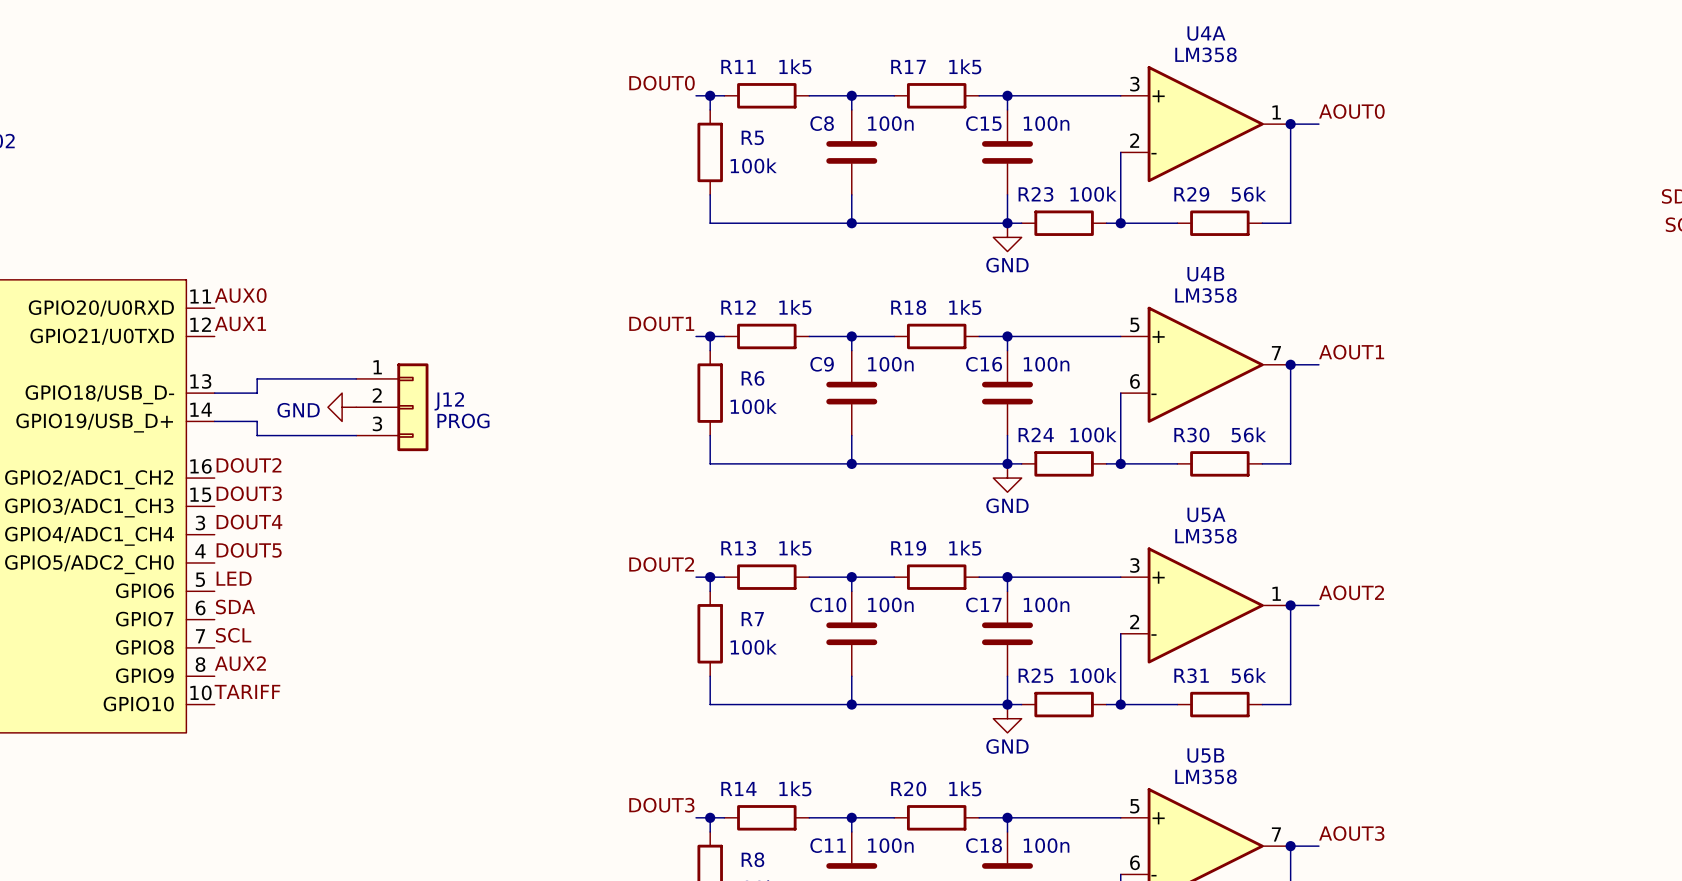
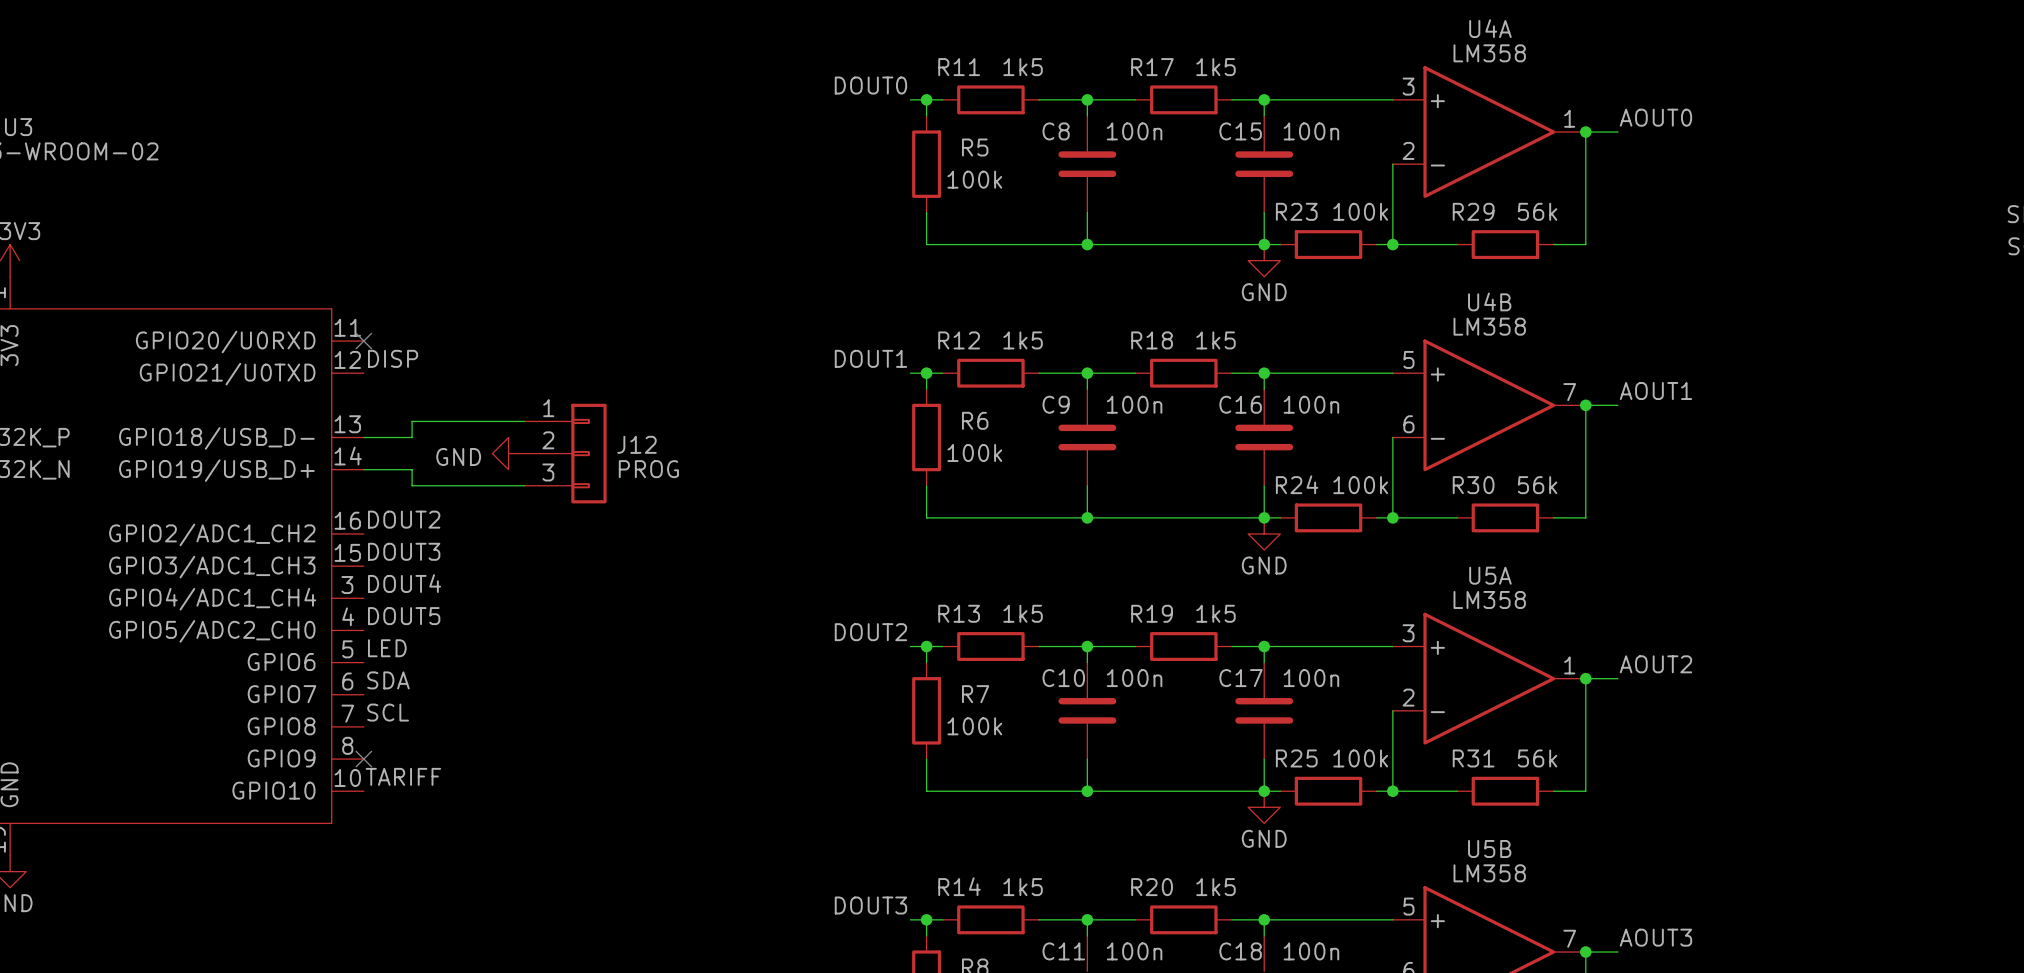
label: AUX0 (240, 295) -> none
no-connect mark: none -> (363, 341)
label: AUX1 (240, 323) -> DISP (393, 358)
label: AUX2 (240, 663) -> none
no-connect mark: none -> (363, 759)

